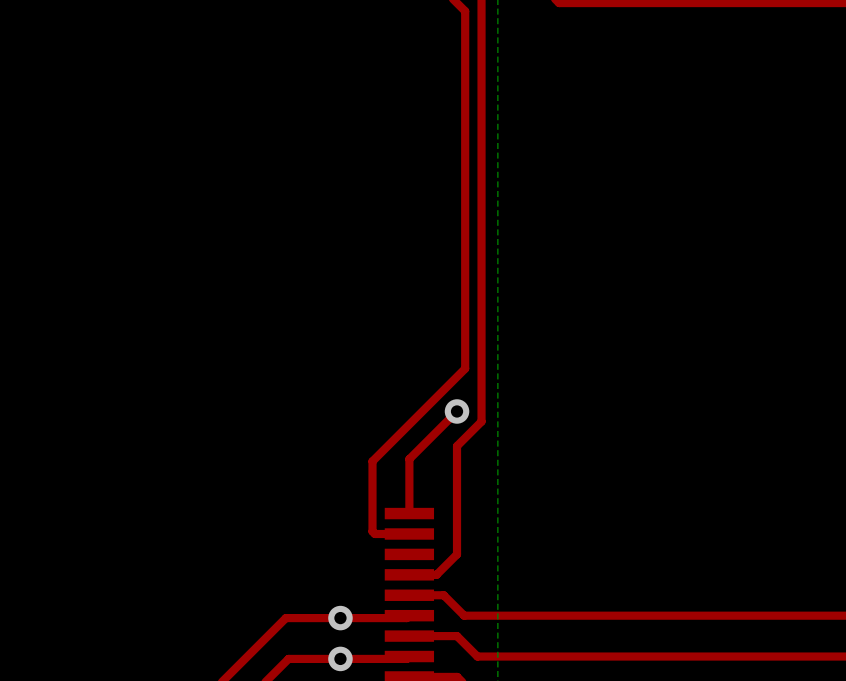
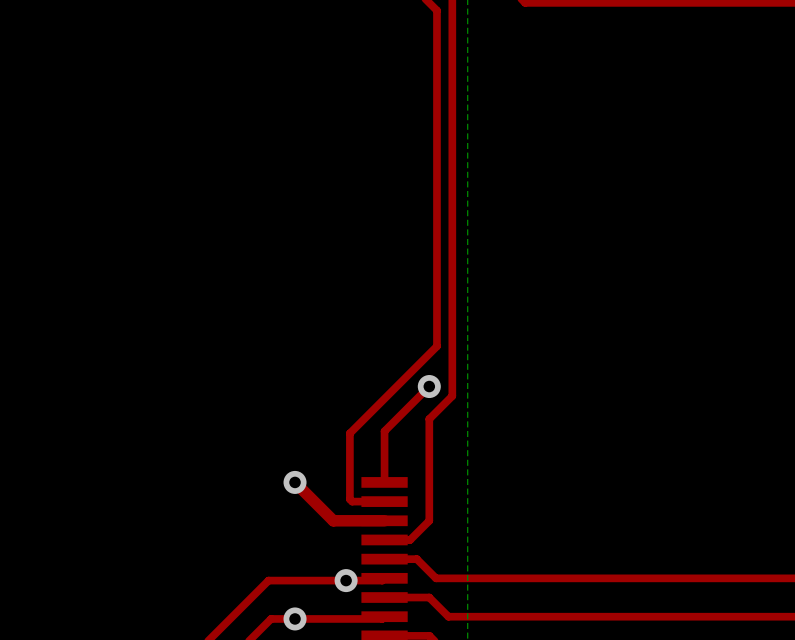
top track: none -> (295, 482) (333, 520) (384, 520)
via: none -> (295, 482)
via: (340, 618) -> none
via: none -> (346, 580)
via: none -> (295, 618)
via: (340, 658) -> none

